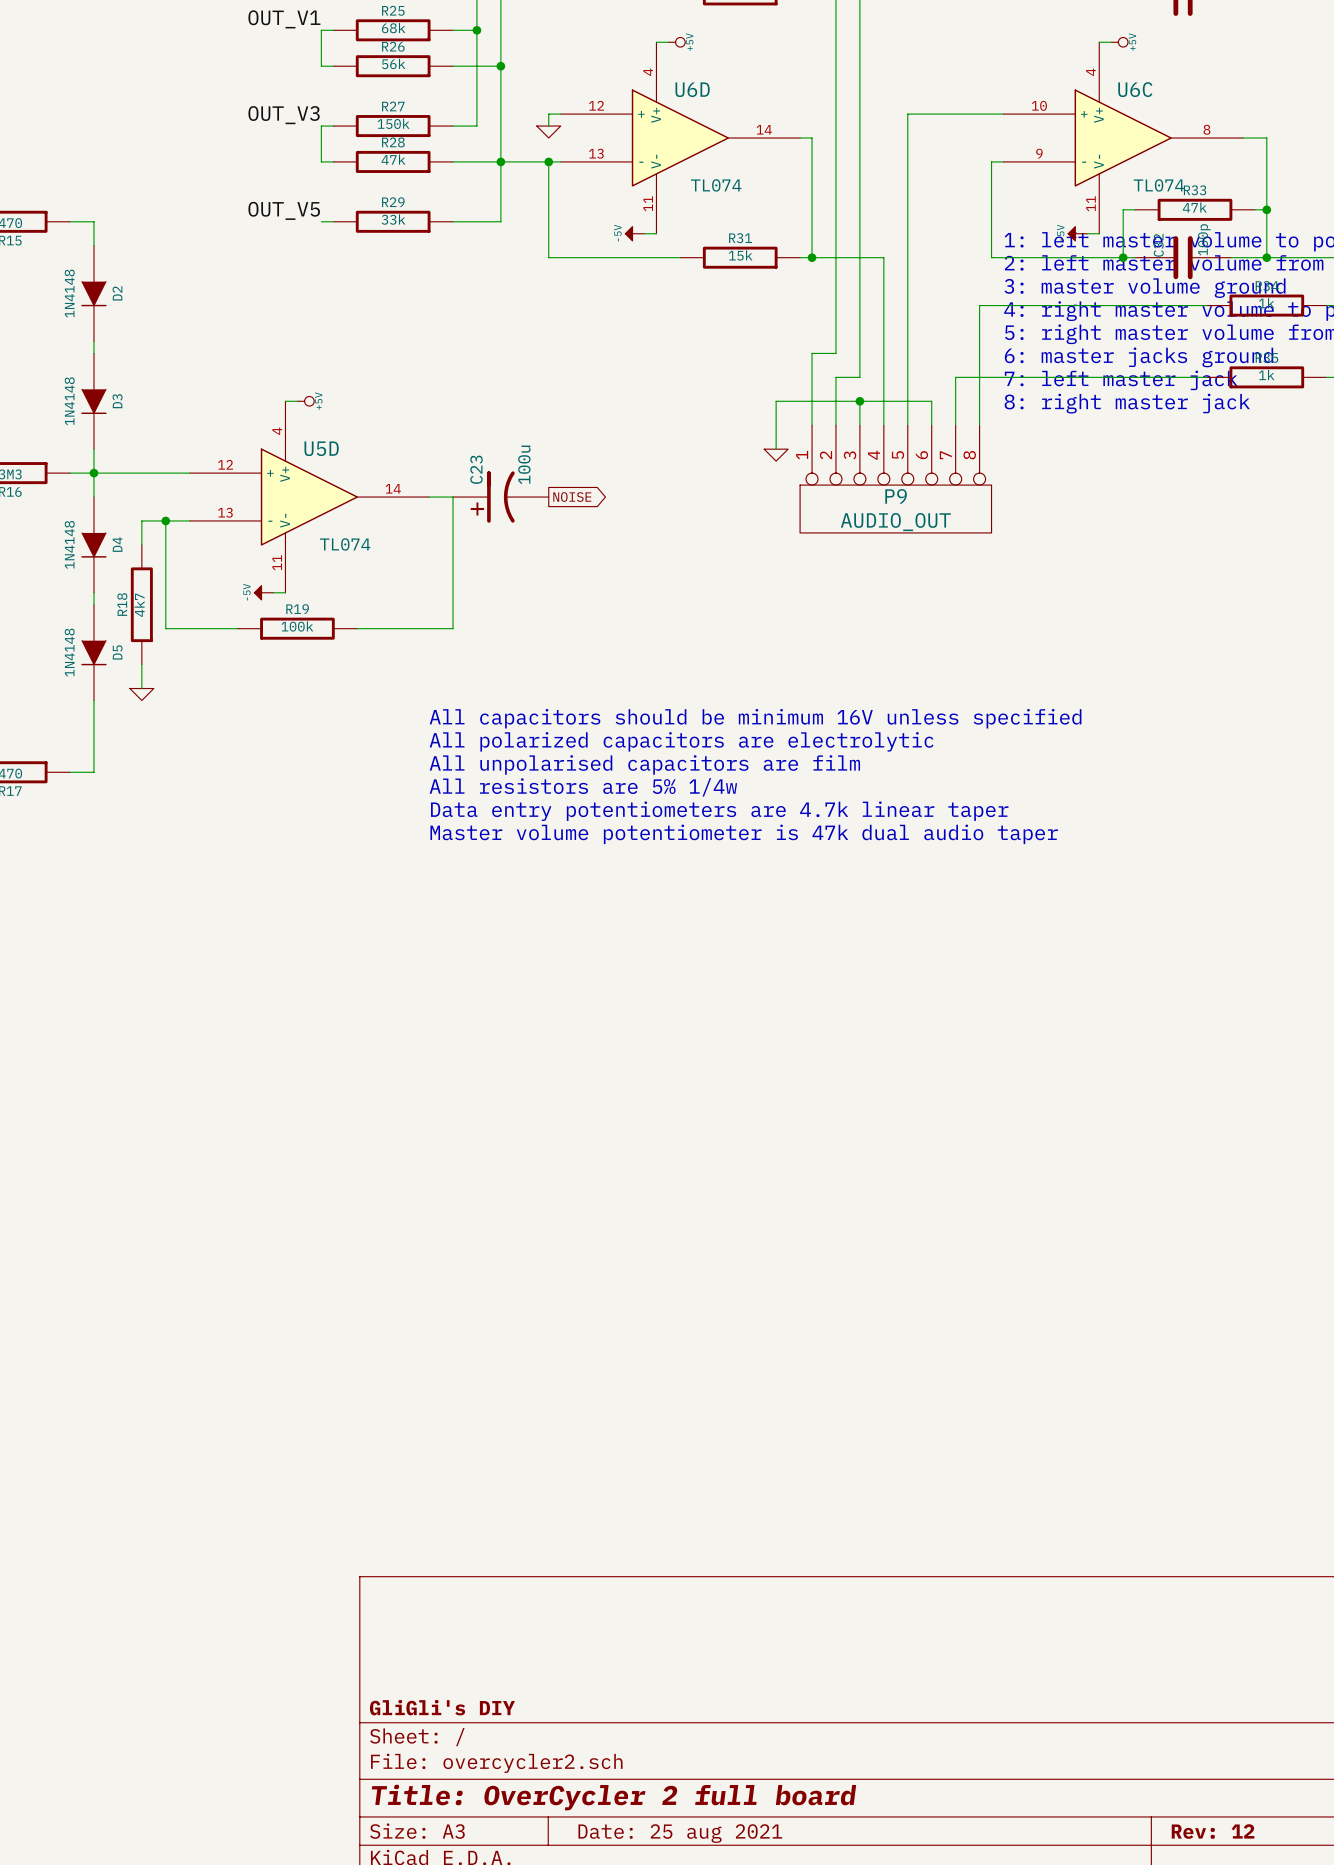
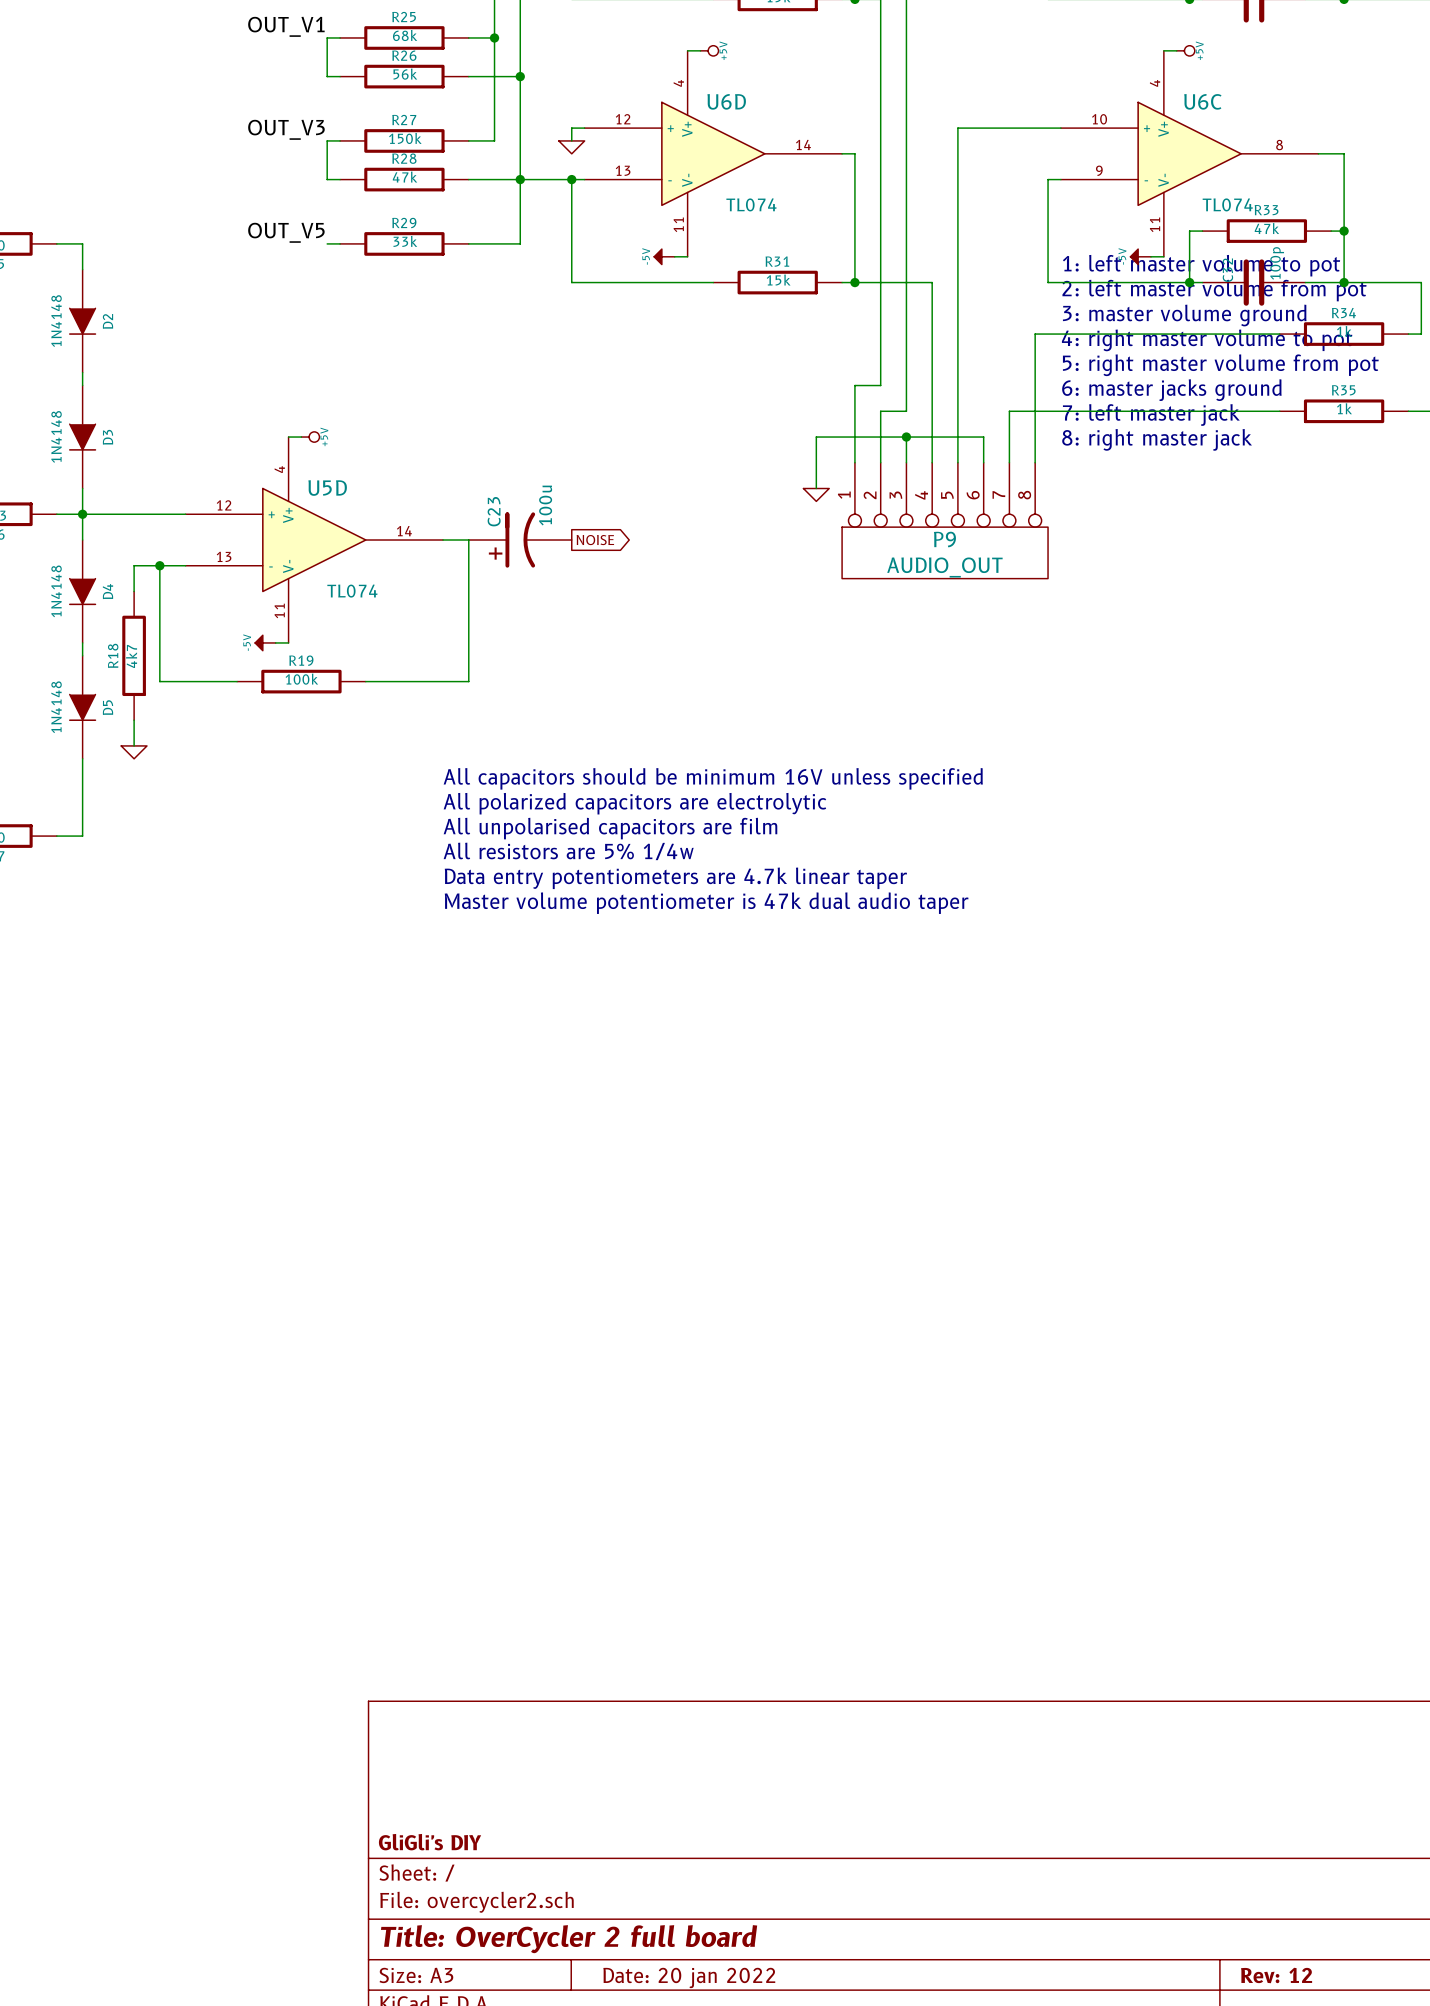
title block: Date: 25 aug 2021 (680, 1833) -> Date: 20 jan 2022 (689, 1977)

